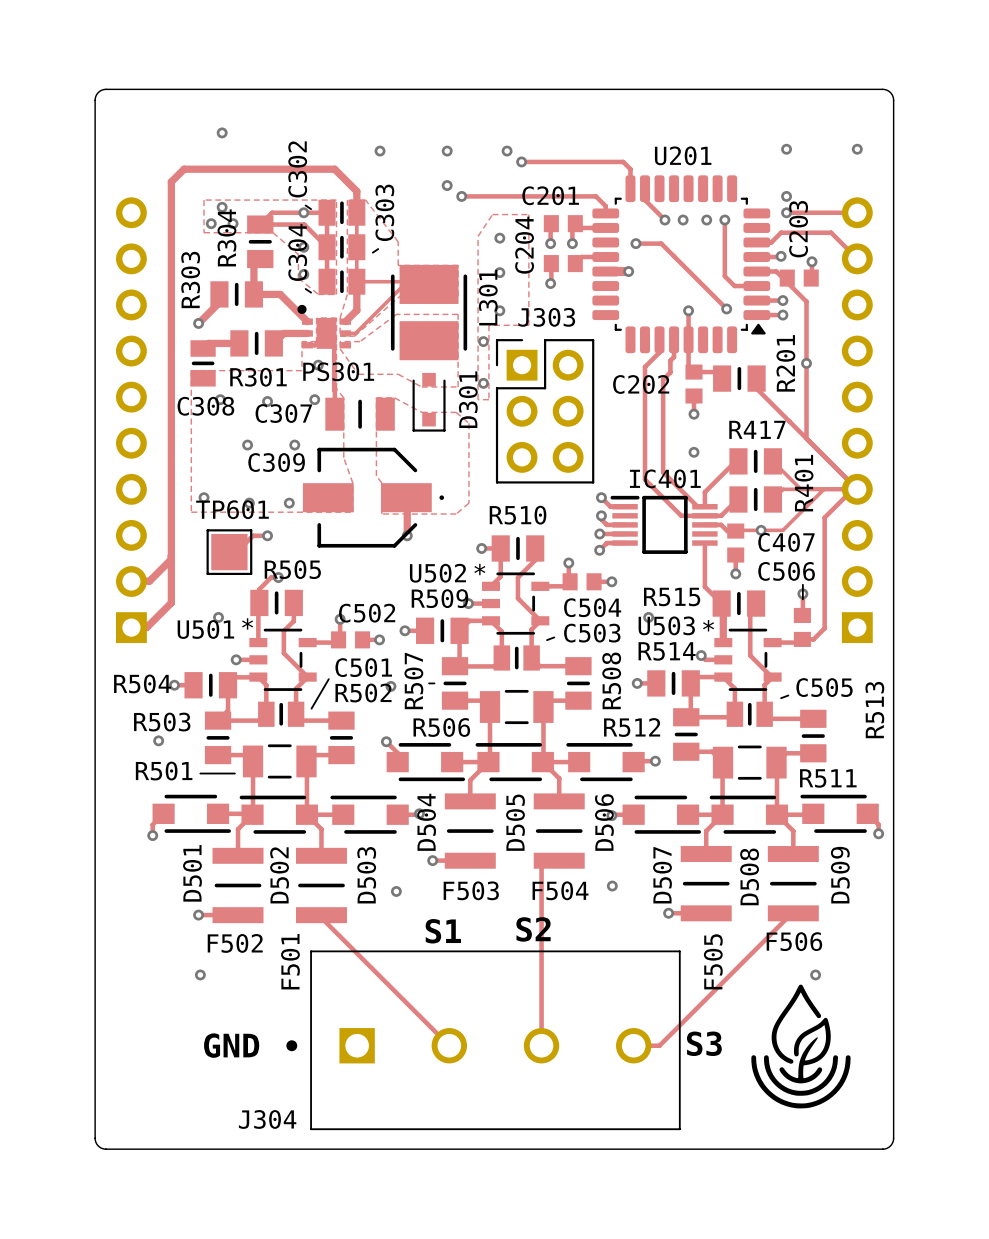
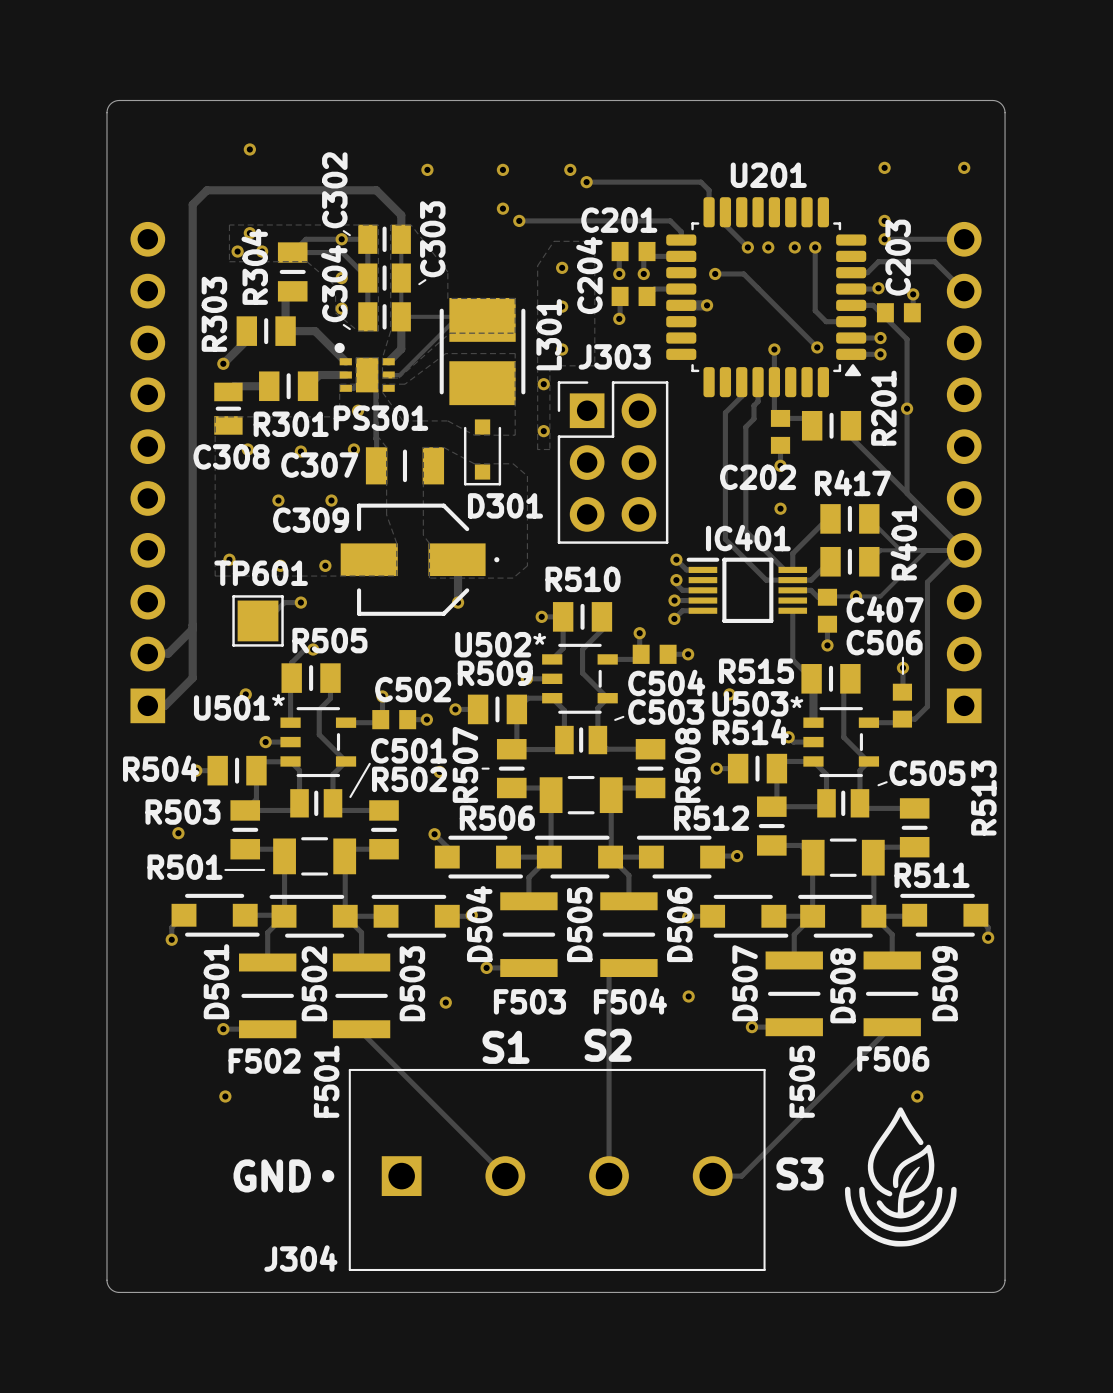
C202 name position: C202 (641, 384) -> C202 (758, 477)
D301 name rotation: 0° (468, 399) -> 90° clockwise (505, 505)

